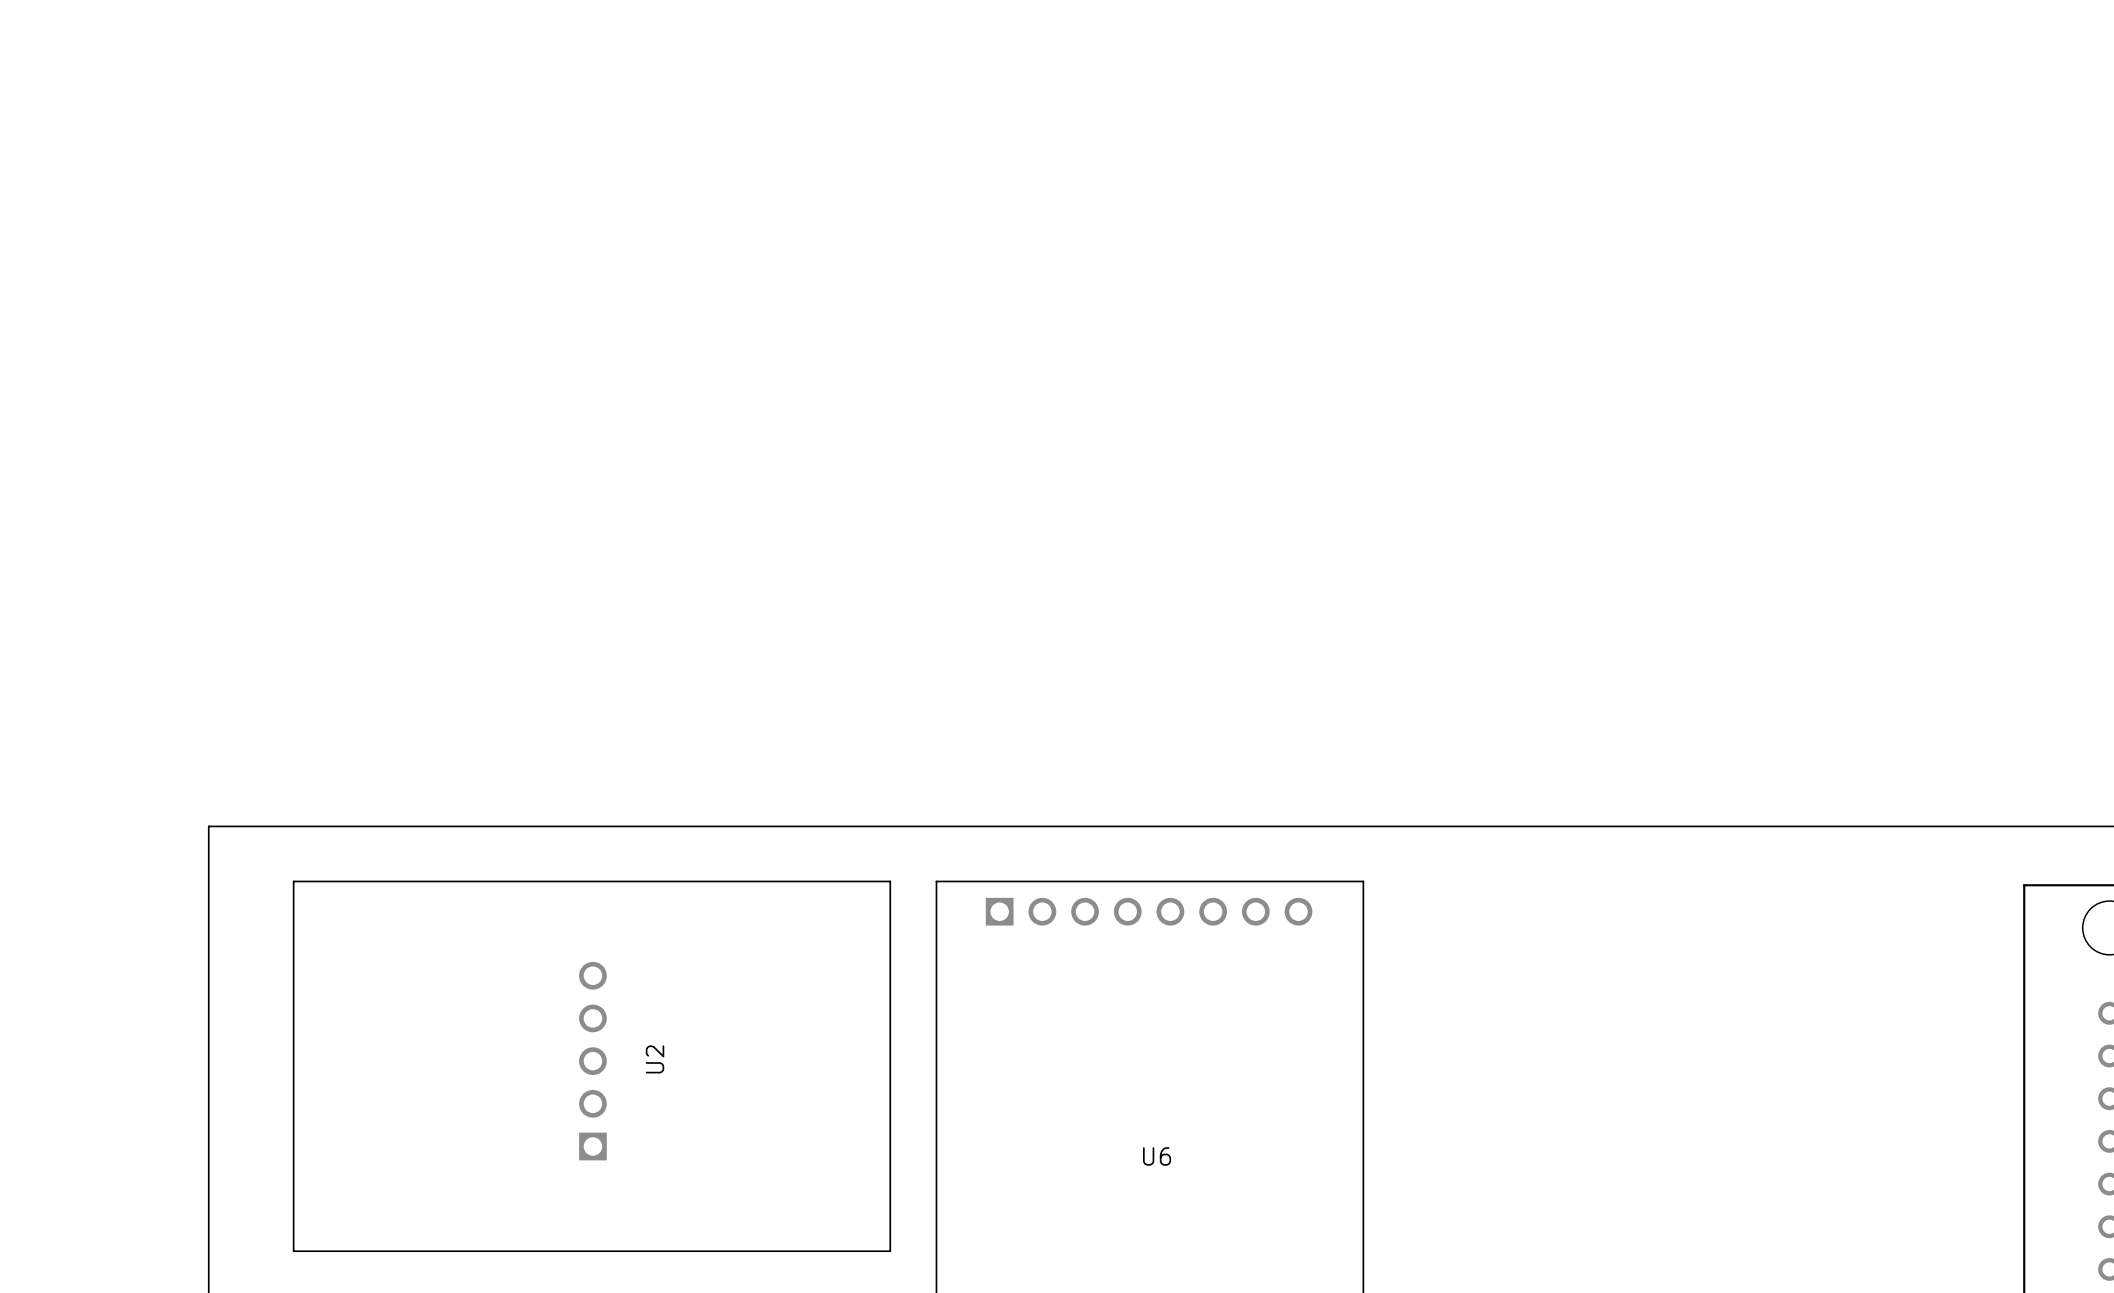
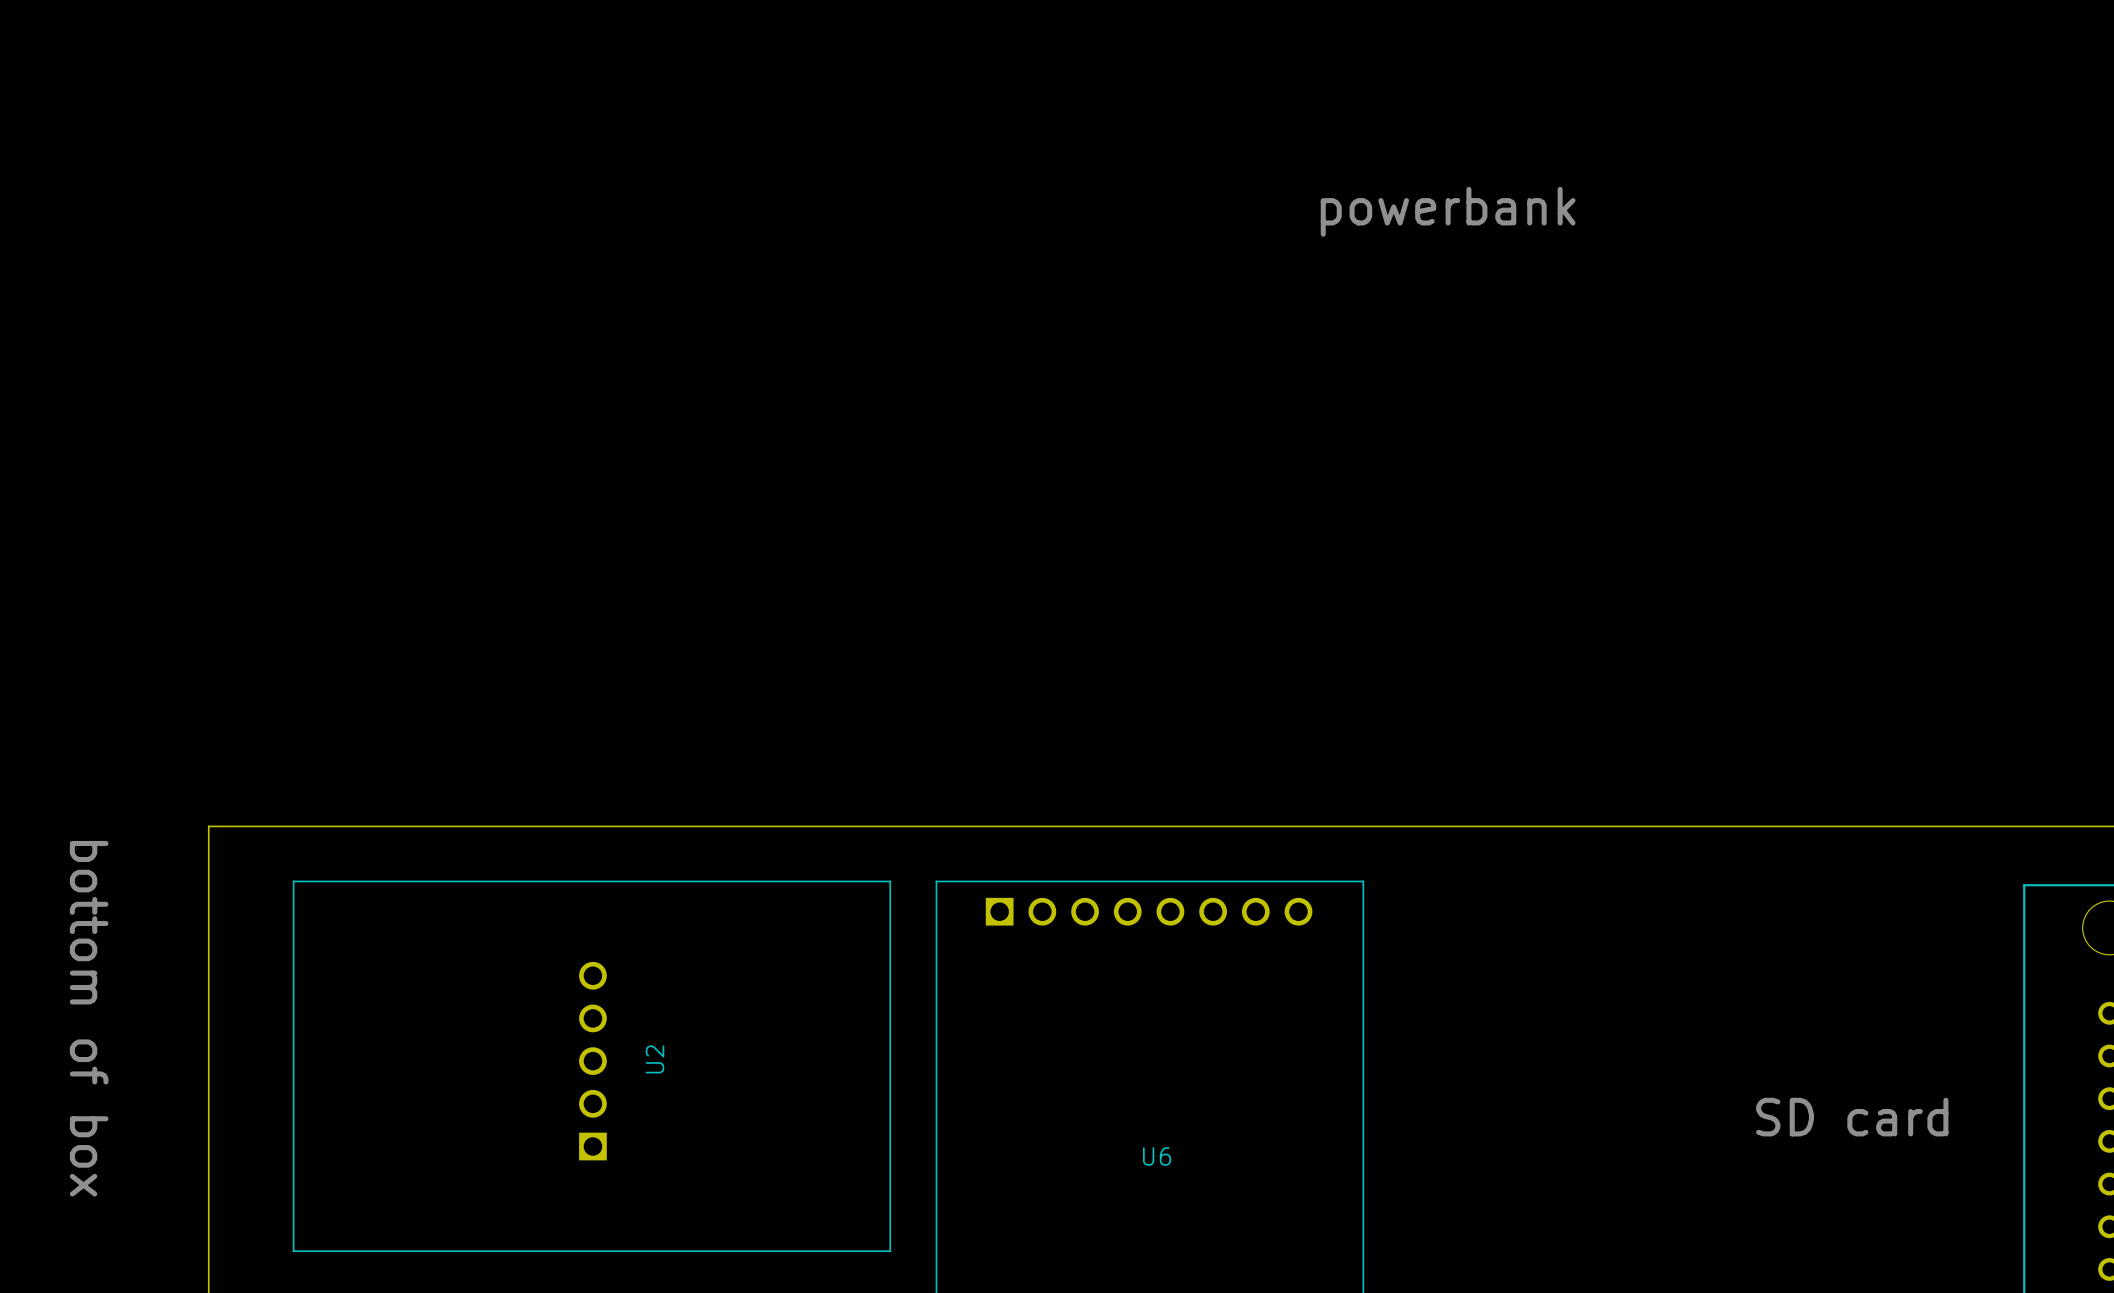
text: none -> powerbank (1448, 211)
text: none -> bottom of box (89, 1018)
text: none -> SD card (1852, 1117)

